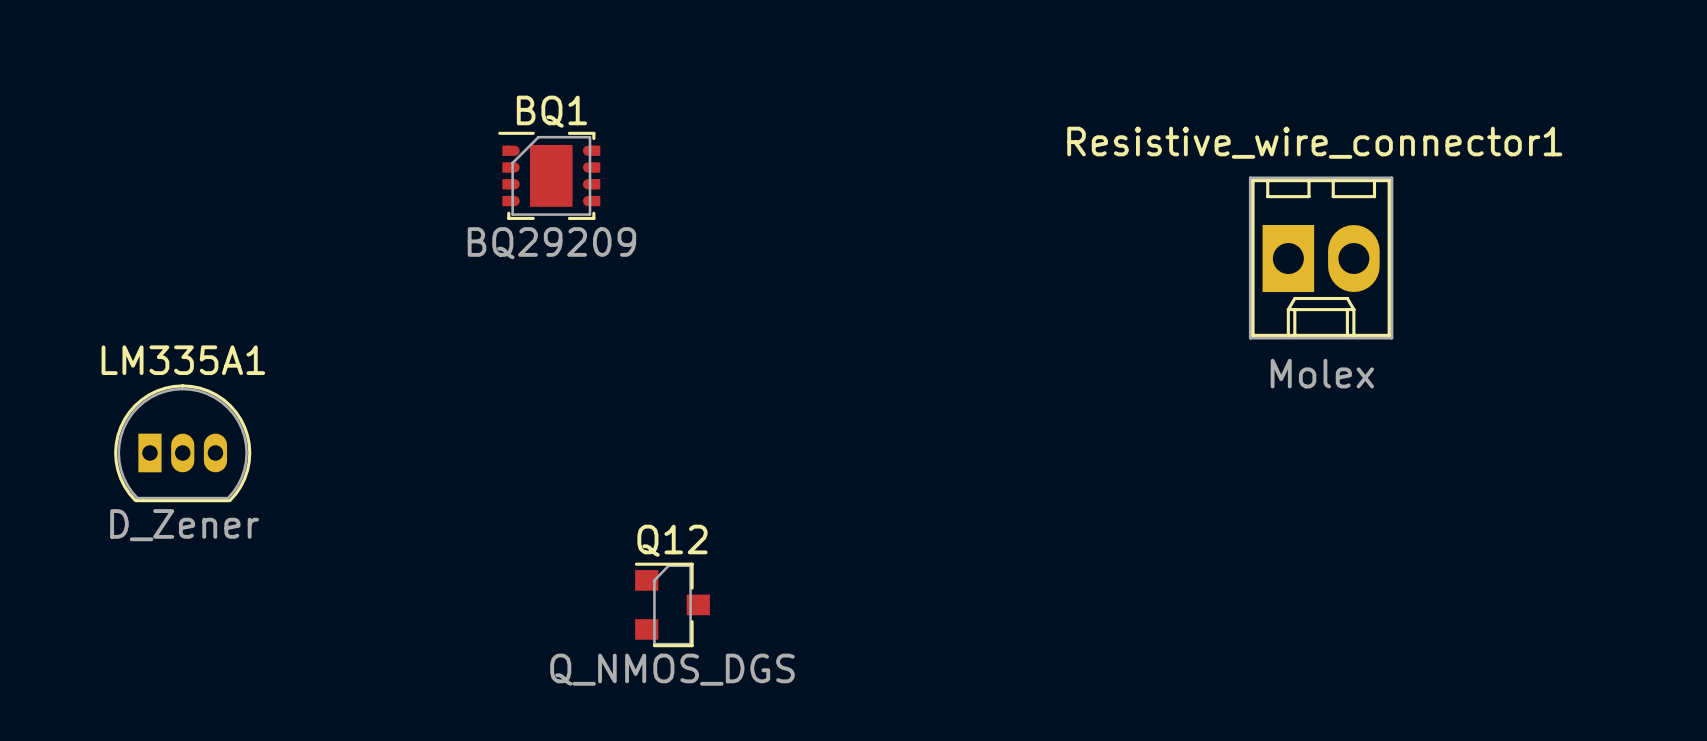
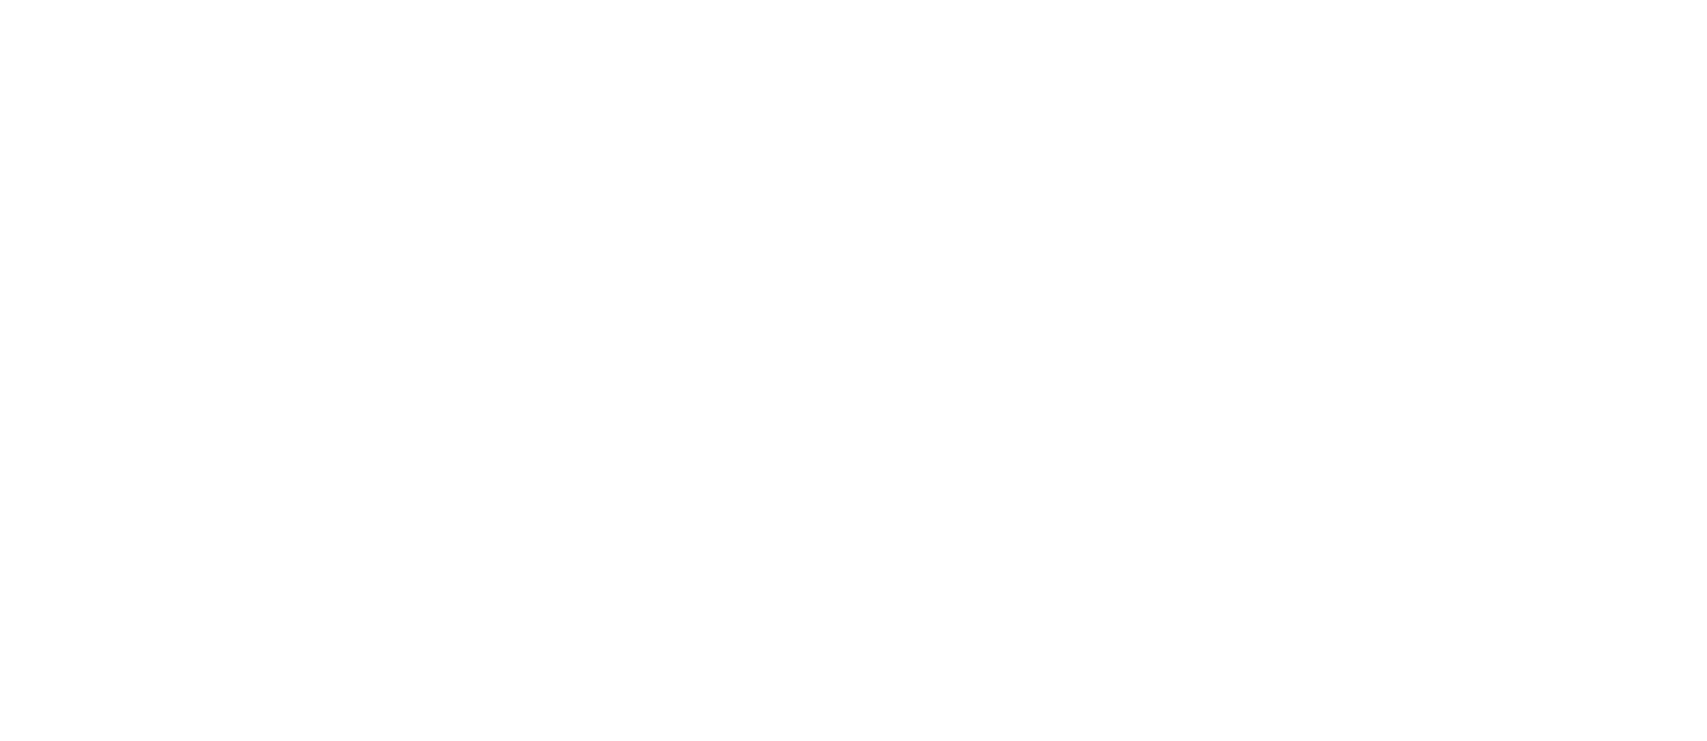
BQ1: BQ29209 (549, 175) -> none
Resistive_wire_connector1: Molex (1321, 258) -> none
LM335A1: D_Zener (182, 443) -> none
Q12: Q_NMOS_DGS (672, 604) -> none

